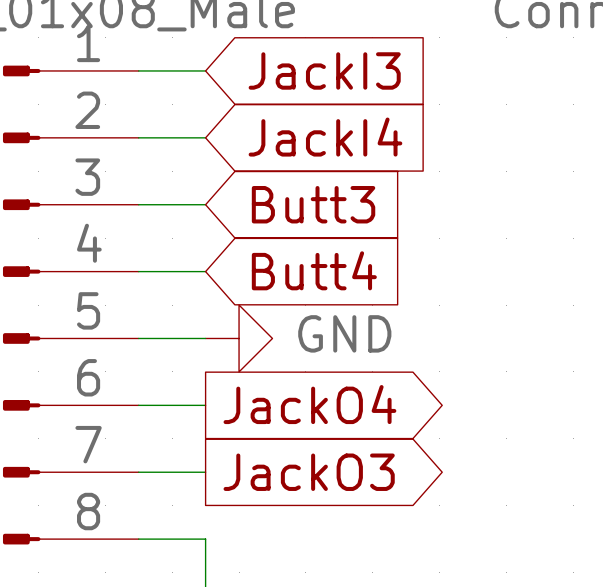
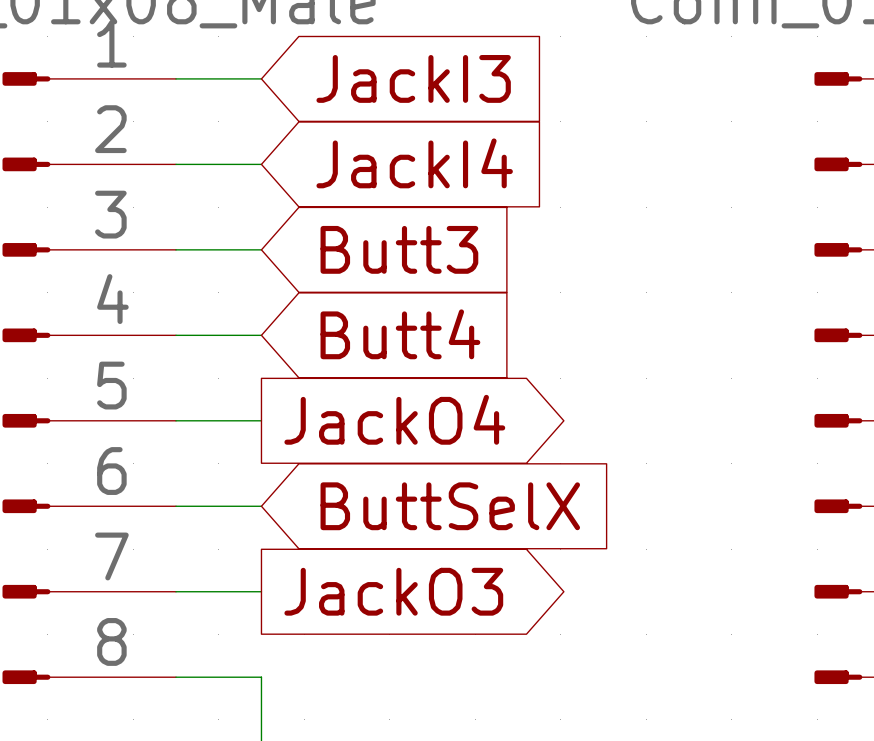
global label: none -> JackO4 (394, 419)
power symbol: GND (239, 338) -> none
global label shape: output (309, 404) -> input (450, 506)
global label: JackO4 (309, 404) -> ButtSelX (450, 506)

